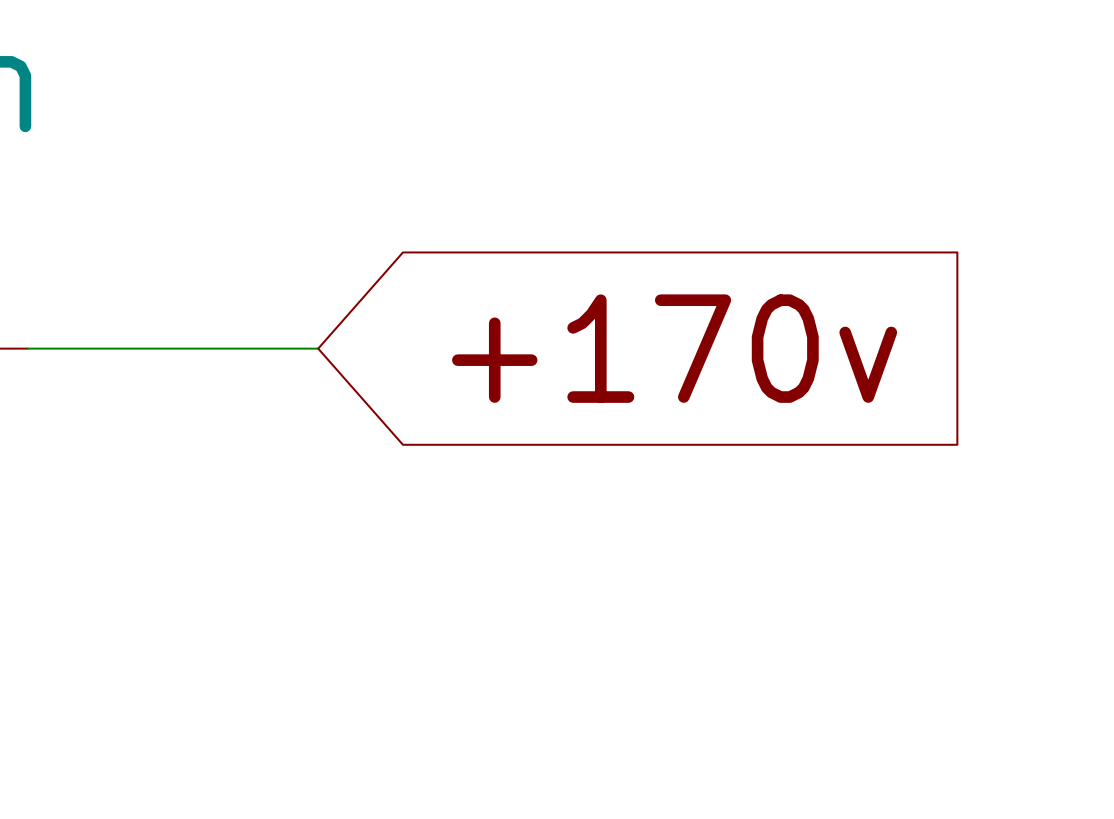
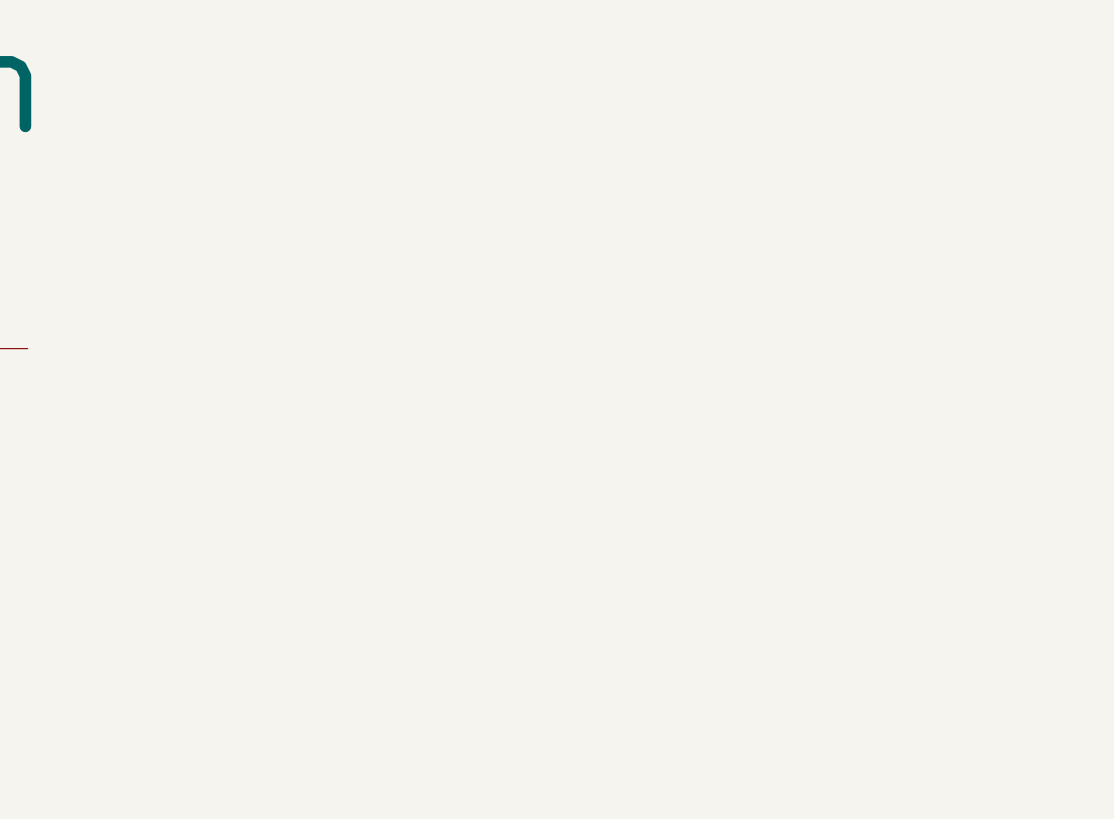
wire: (27, 348) (318, 348) -> none
global label: +170v (674, 348) -> none

